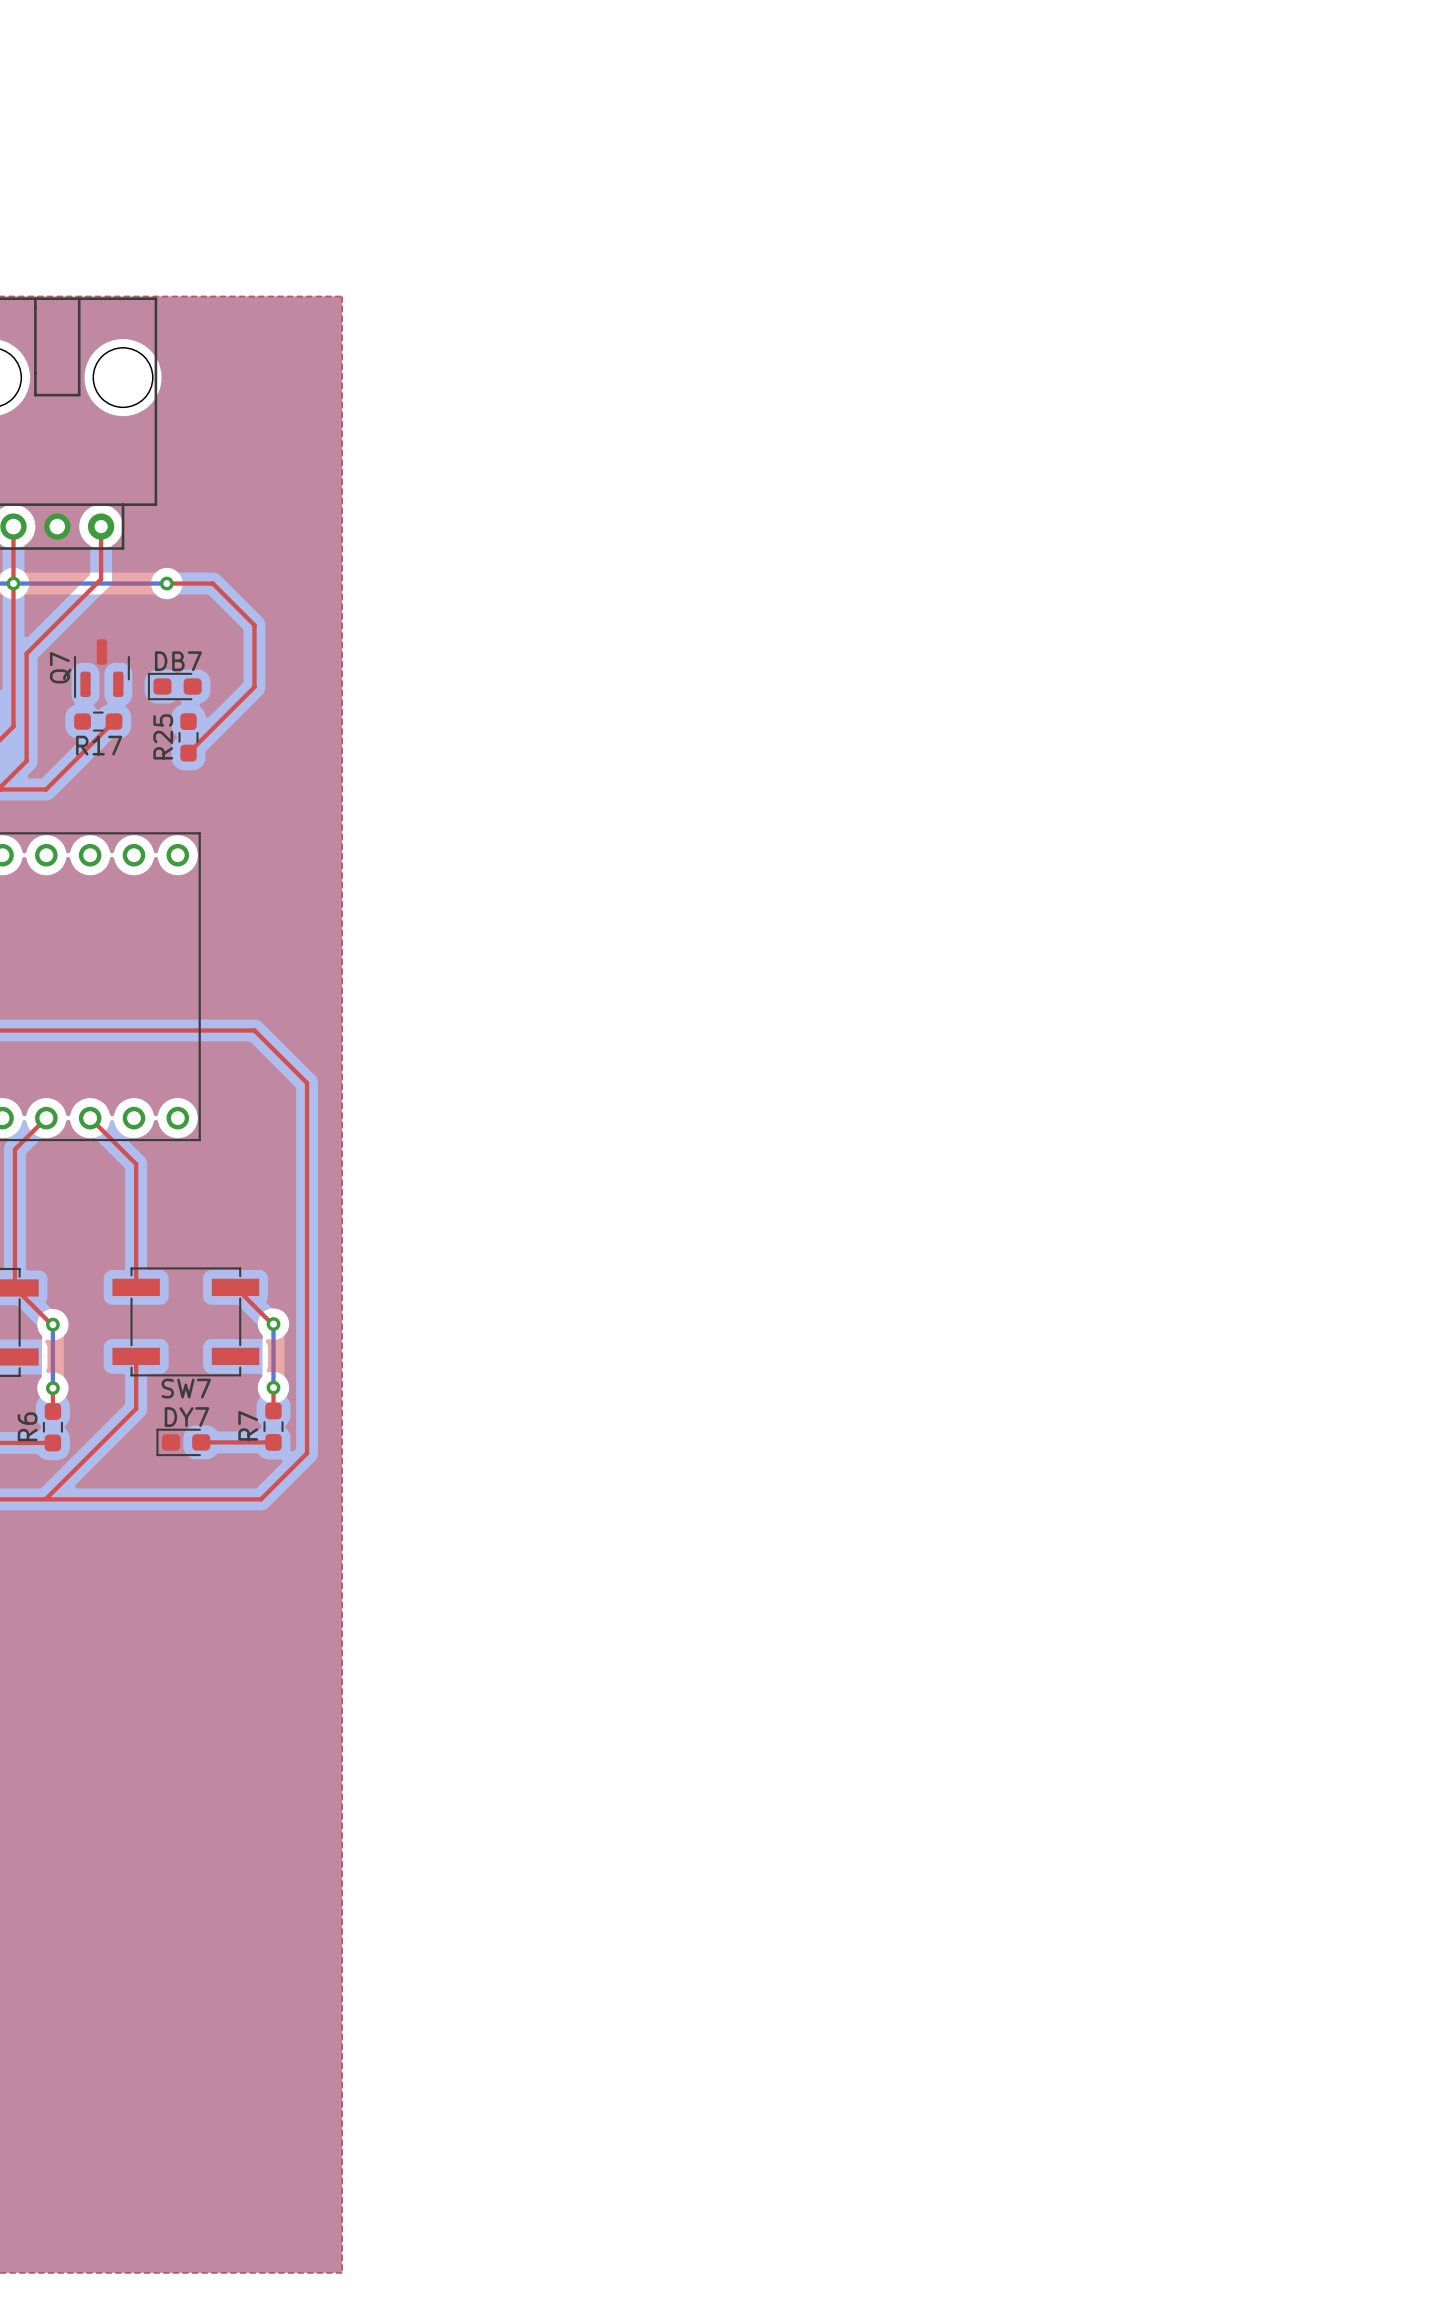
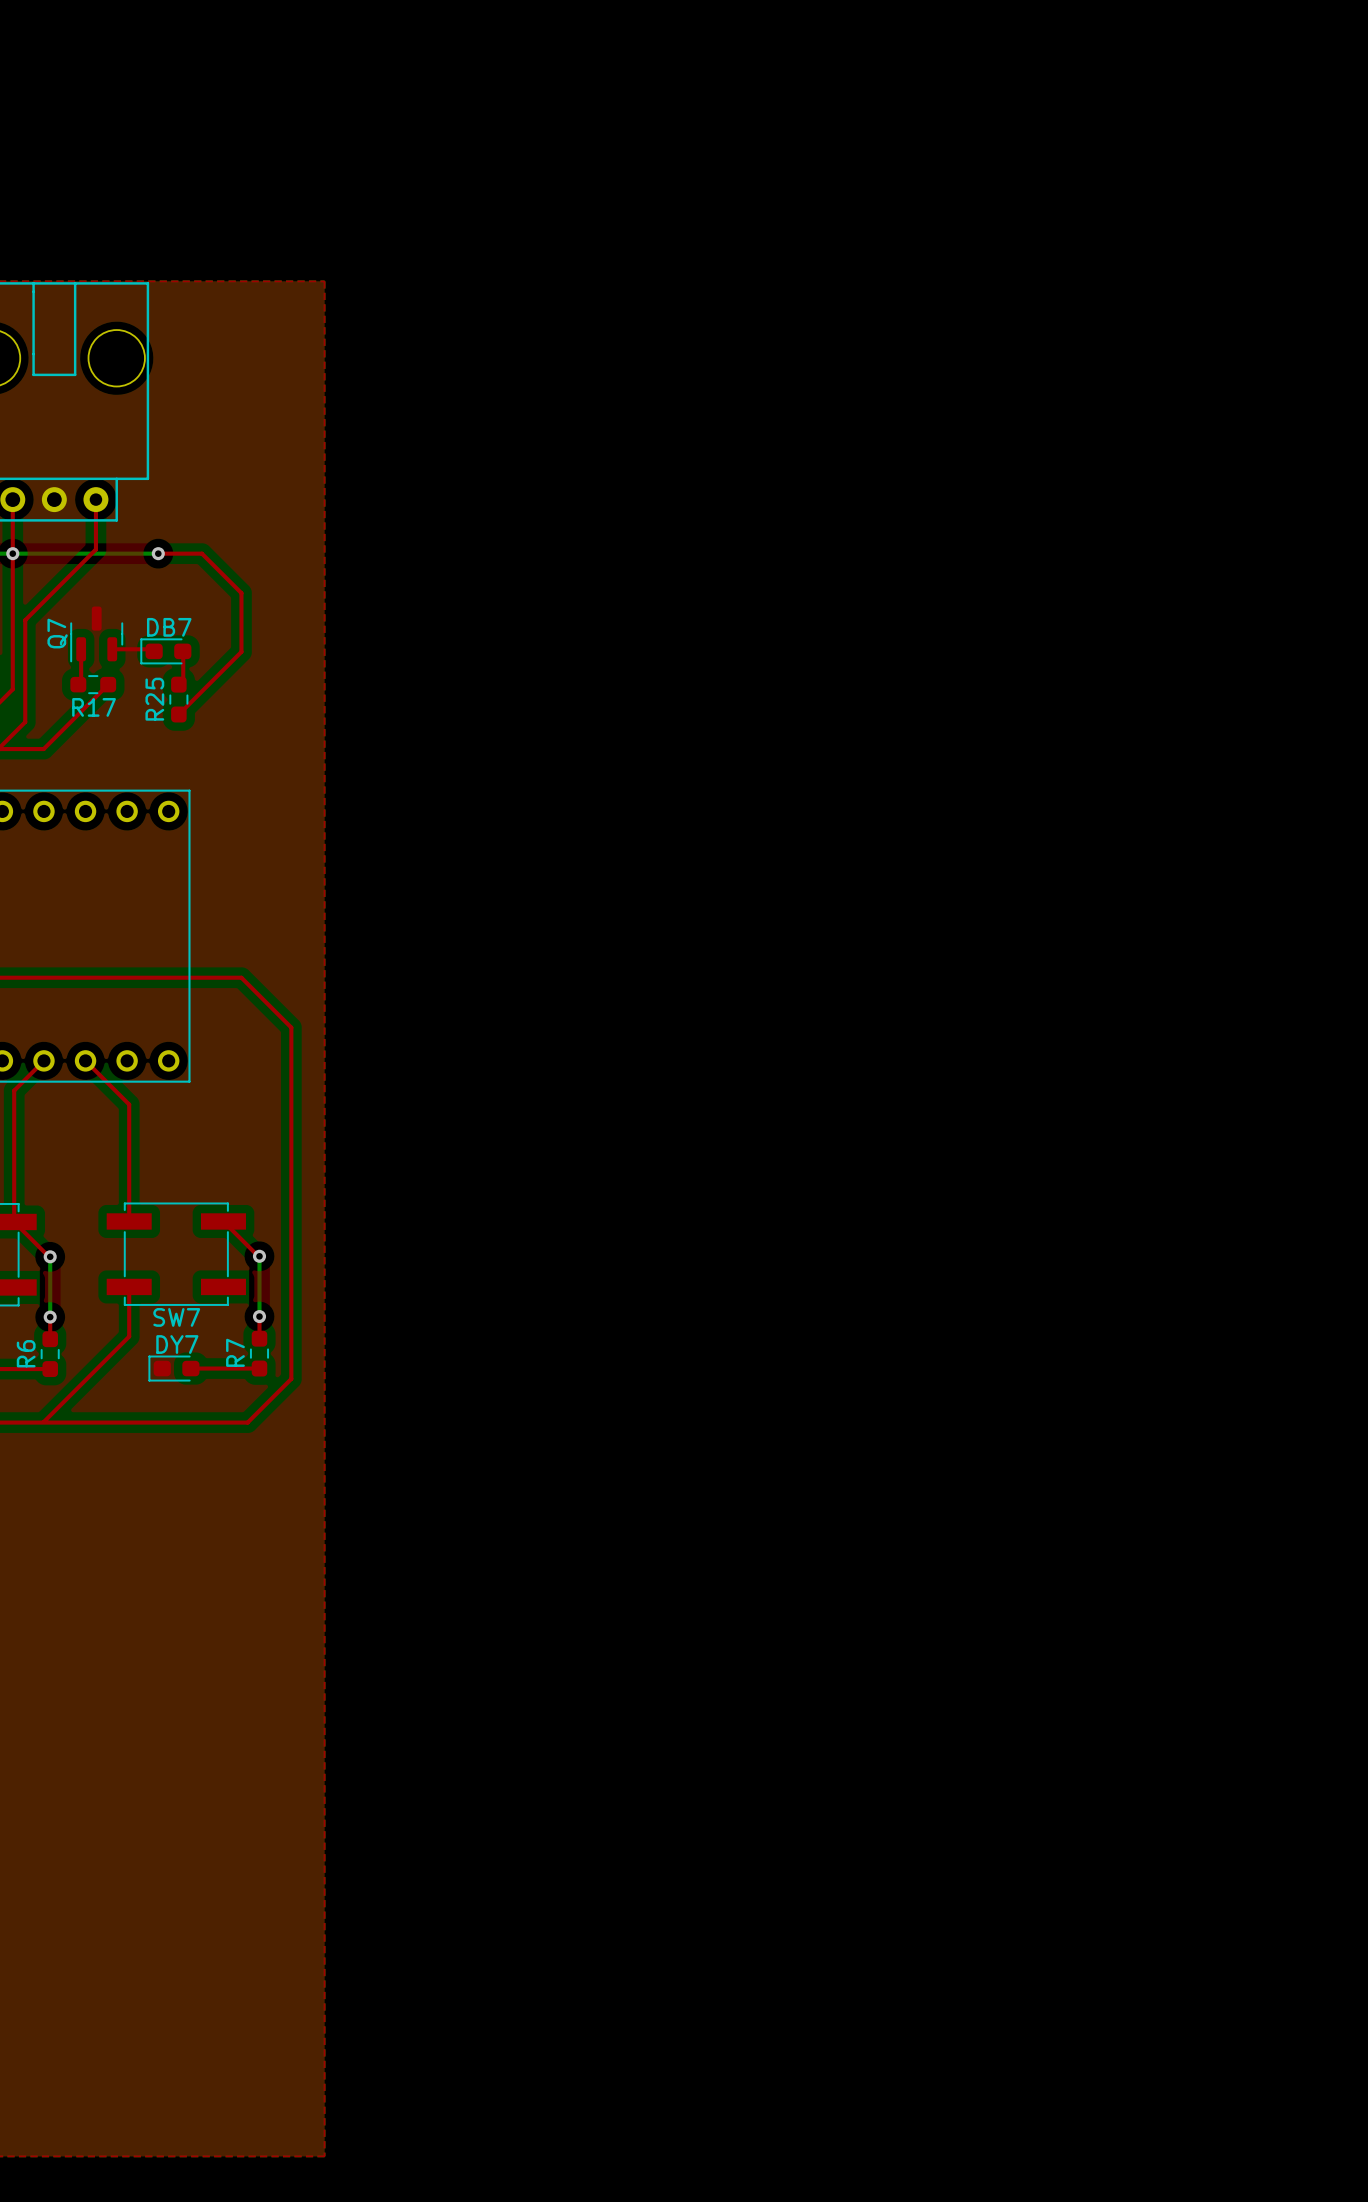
top track: none -> (81, 649) (81, 681) (78, 684)
top track: none -> (112, 649) (152, 649) (154, 651)
top track: none -> (182, 651) (183, 684)

